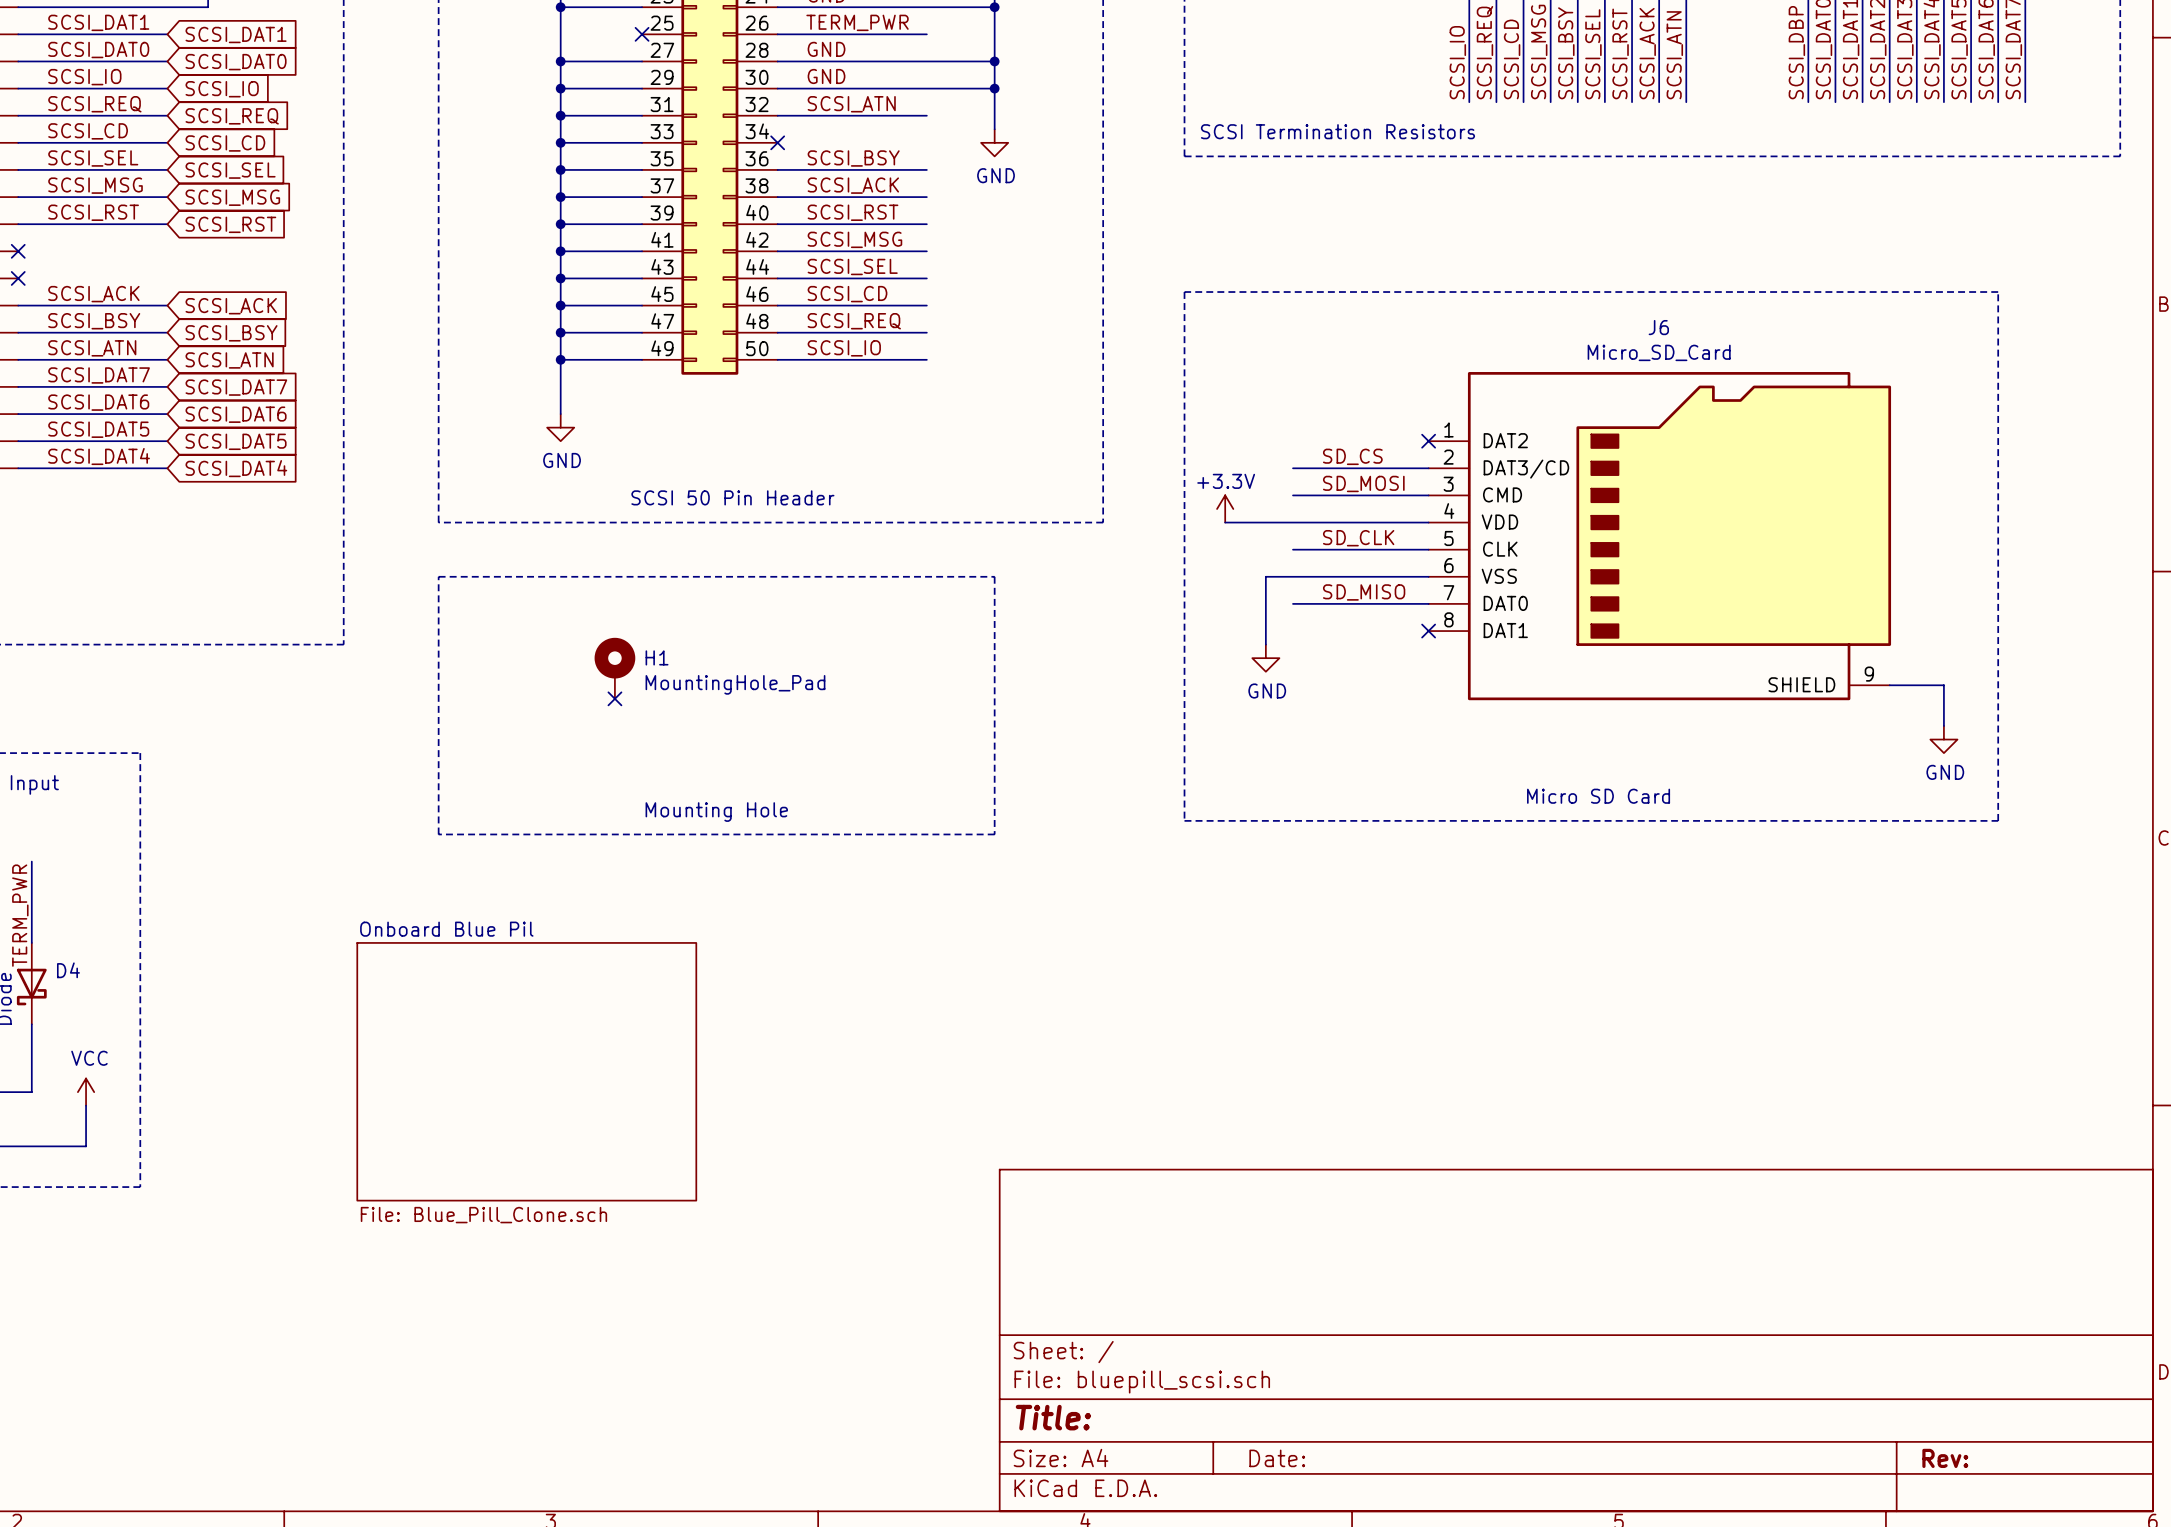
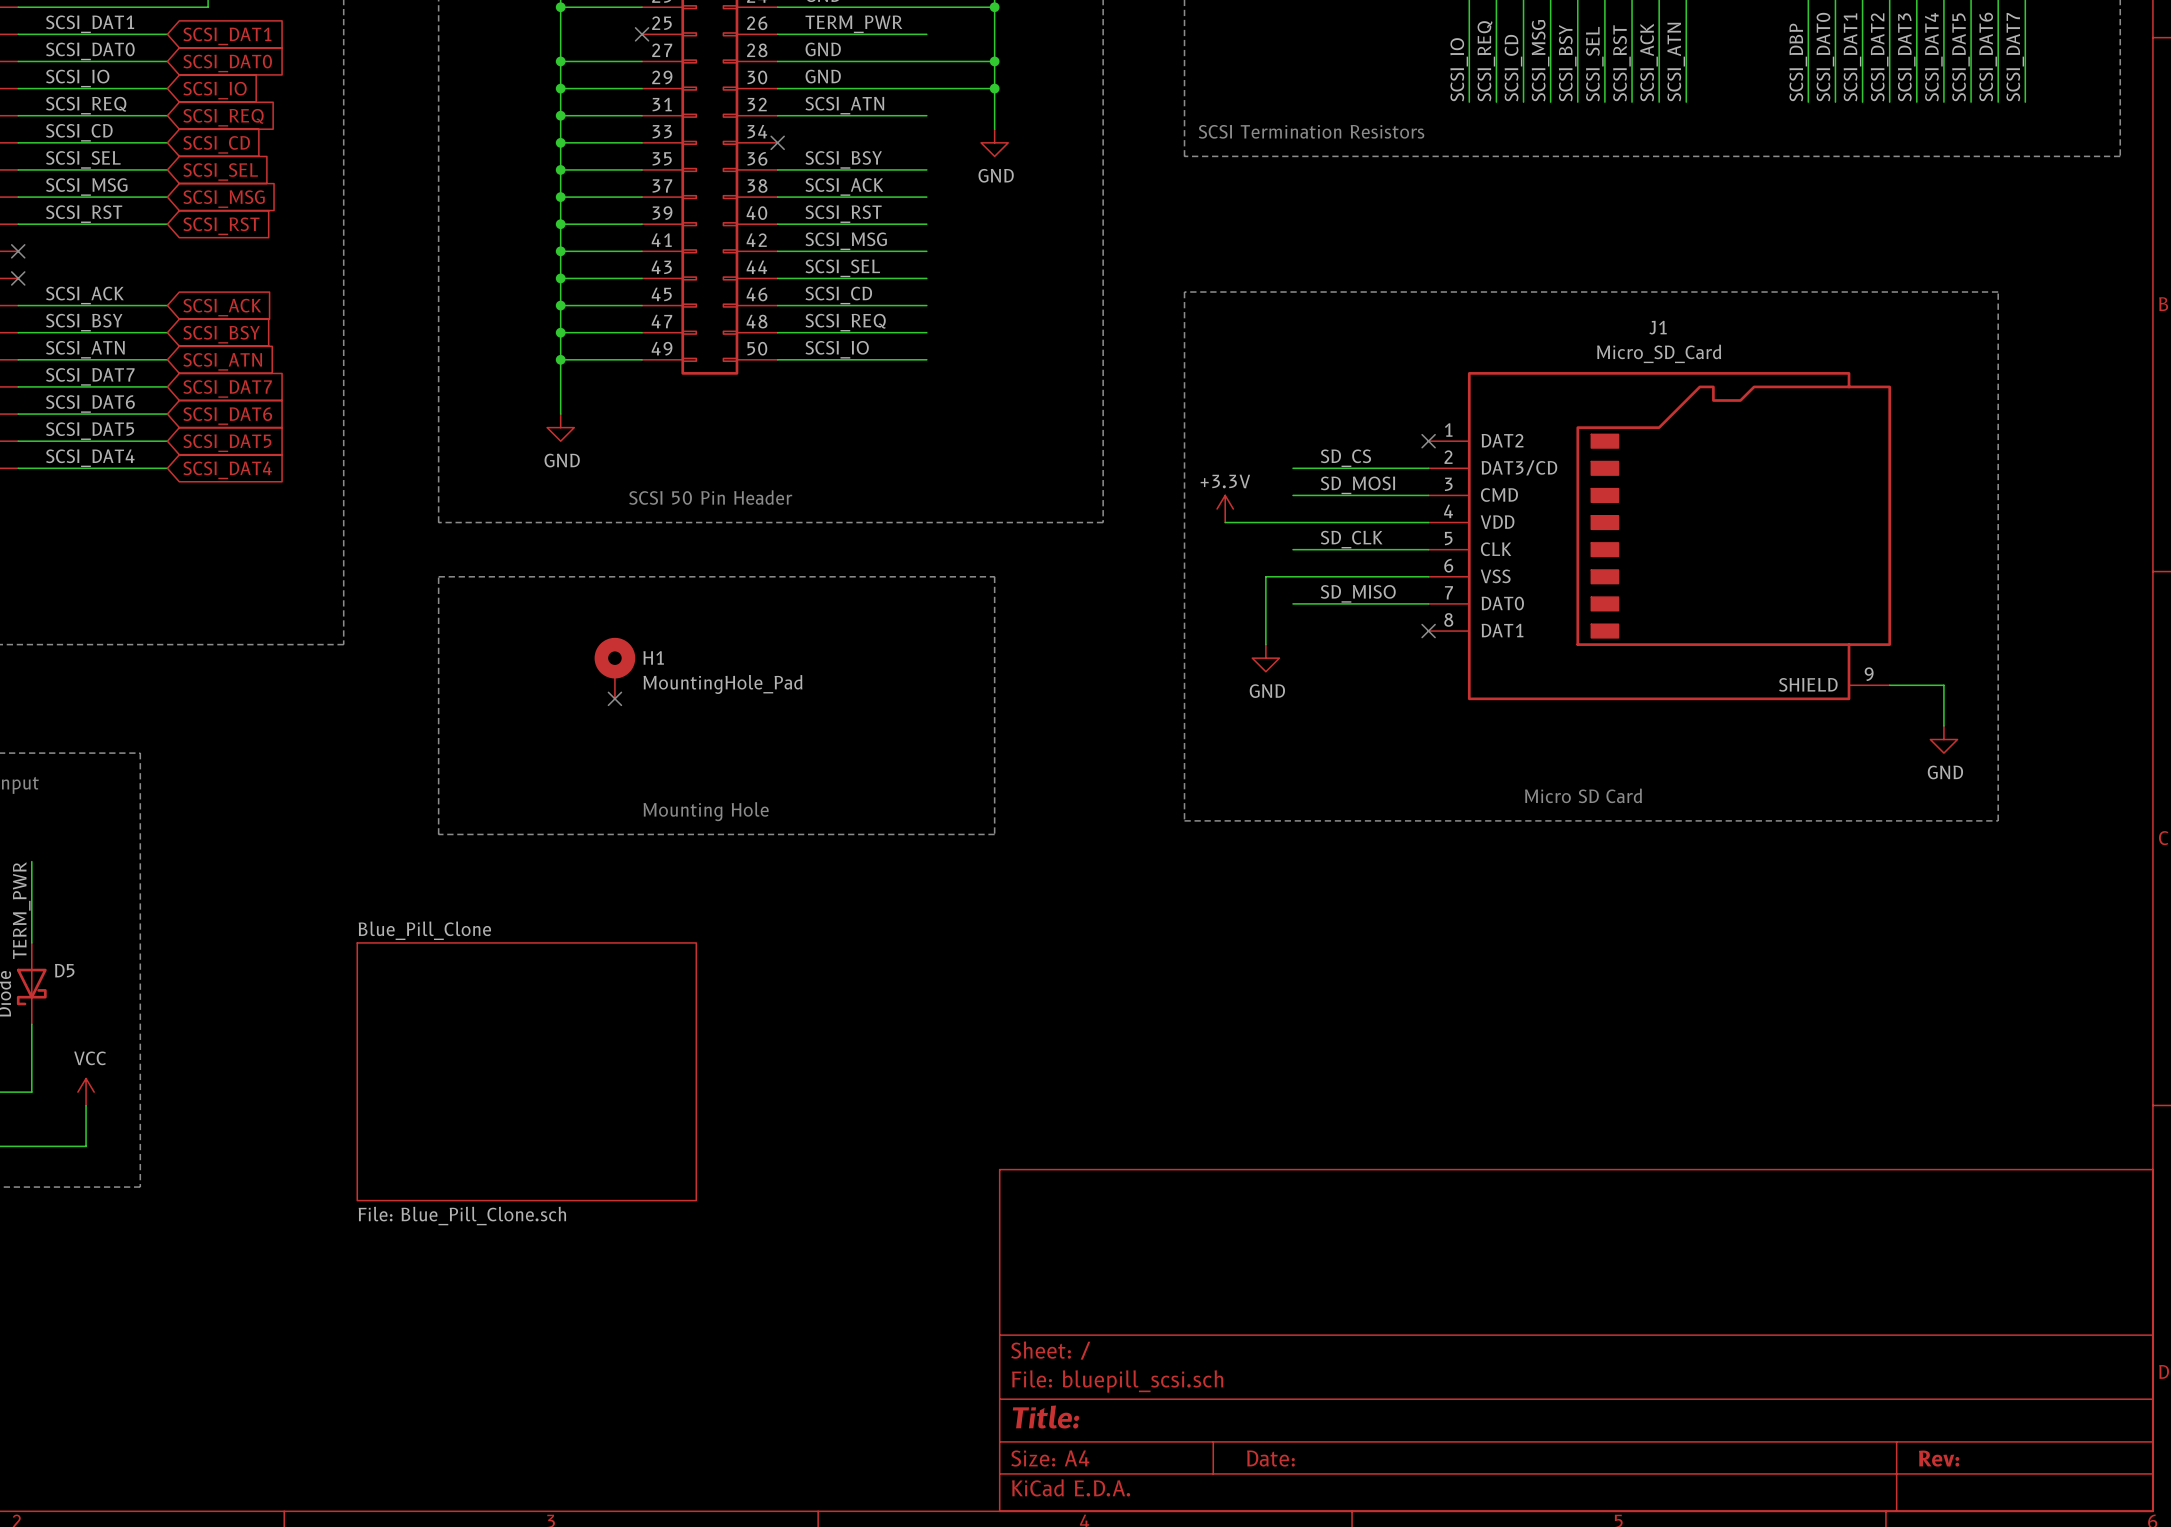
J6 name: J6 (1658, 327) -> J1 (1658, 327)
sheet Onboard Blue Pil name: Onboard Blue Pil (446, 929) -> Blue_Pill_Clone (424, 930)
D4 name: D4 (68, 970) -> D5 (64, 970)

